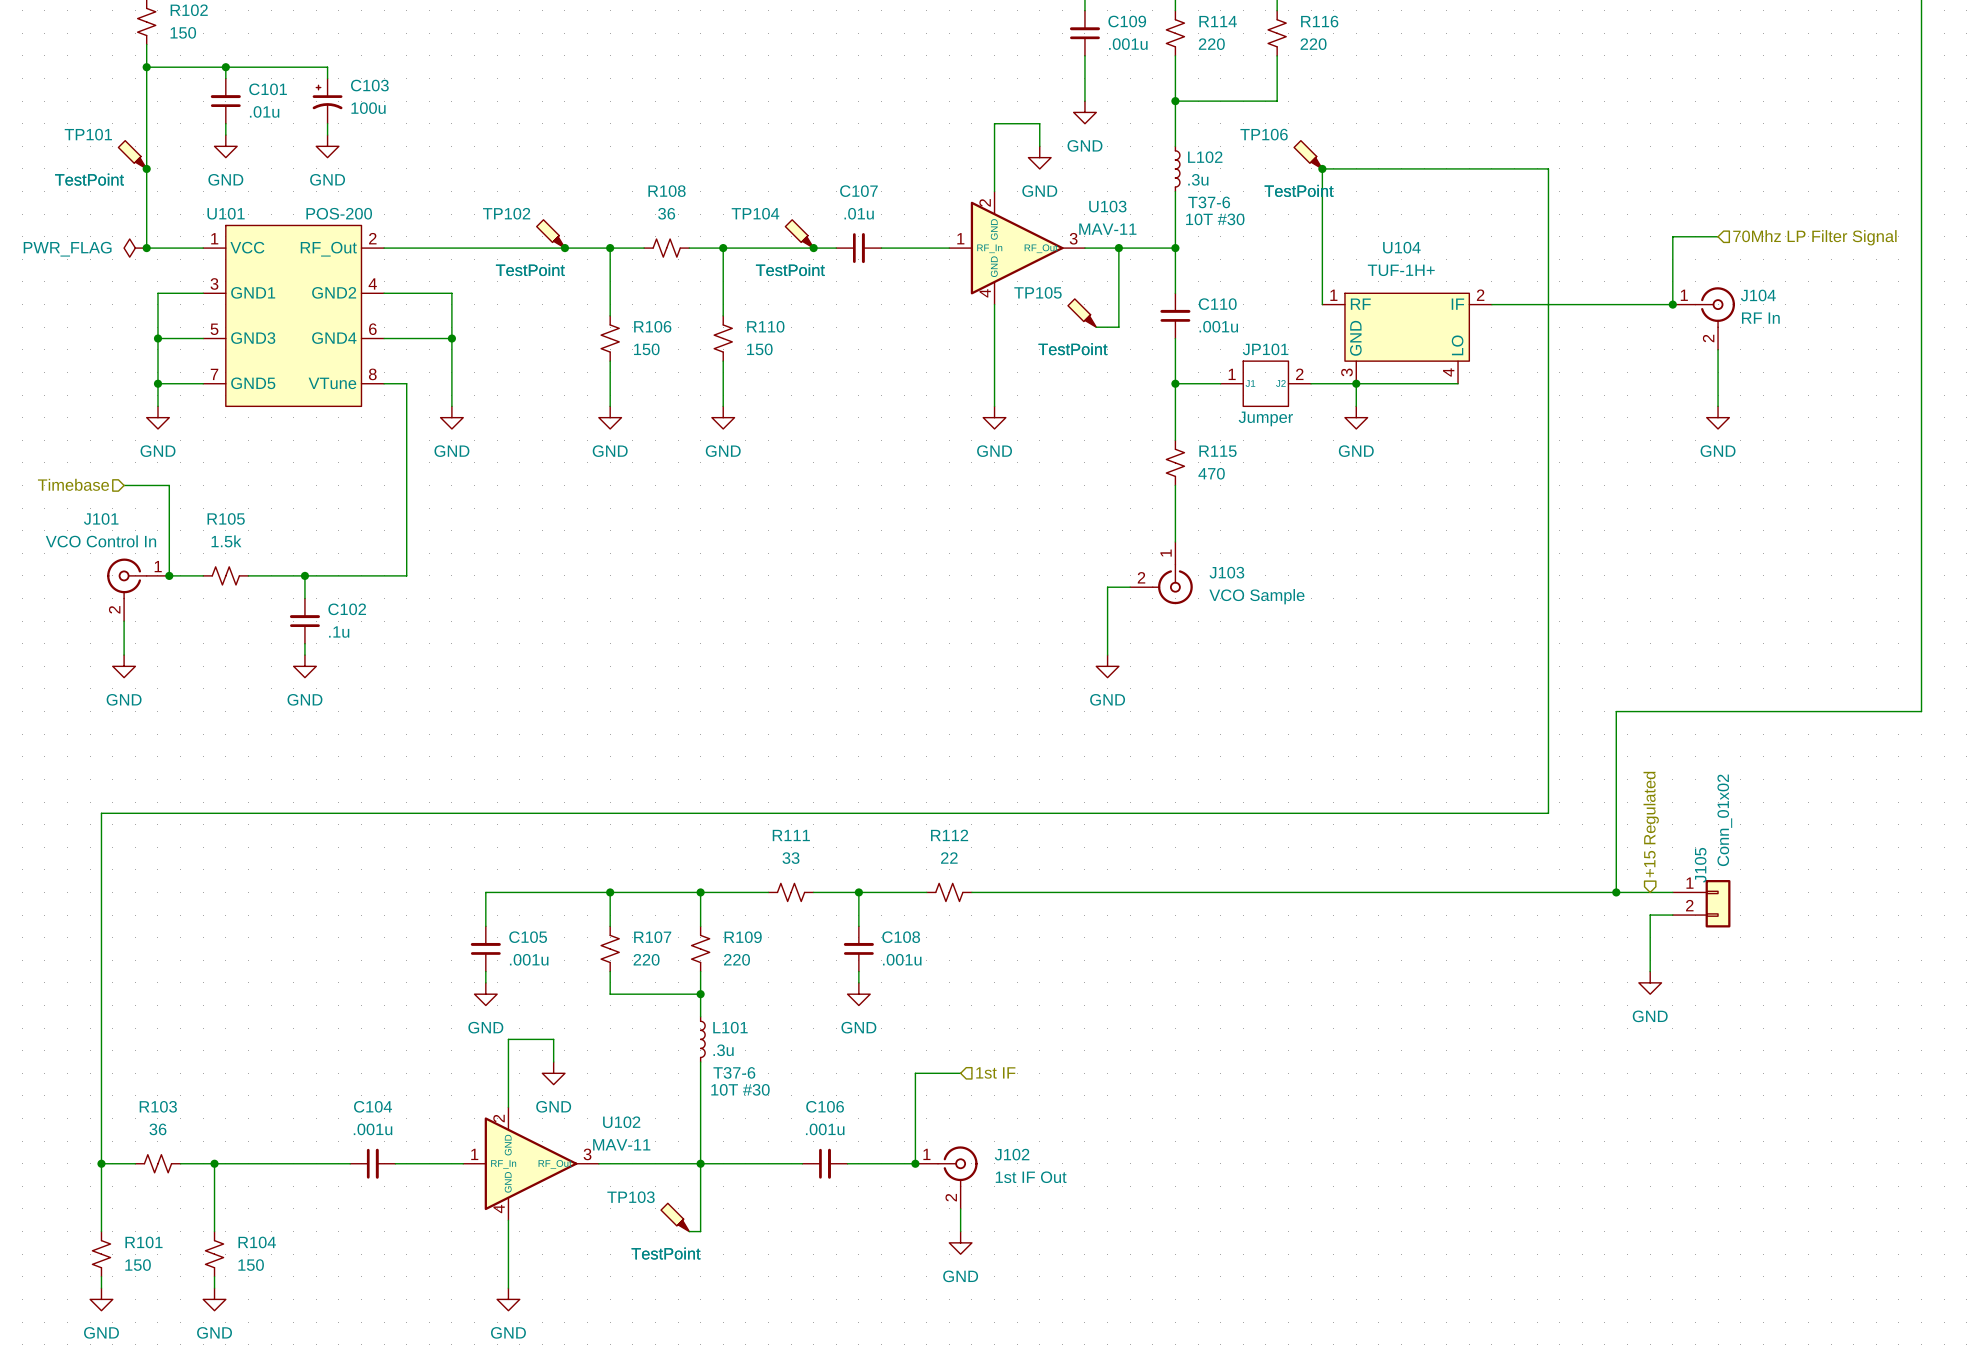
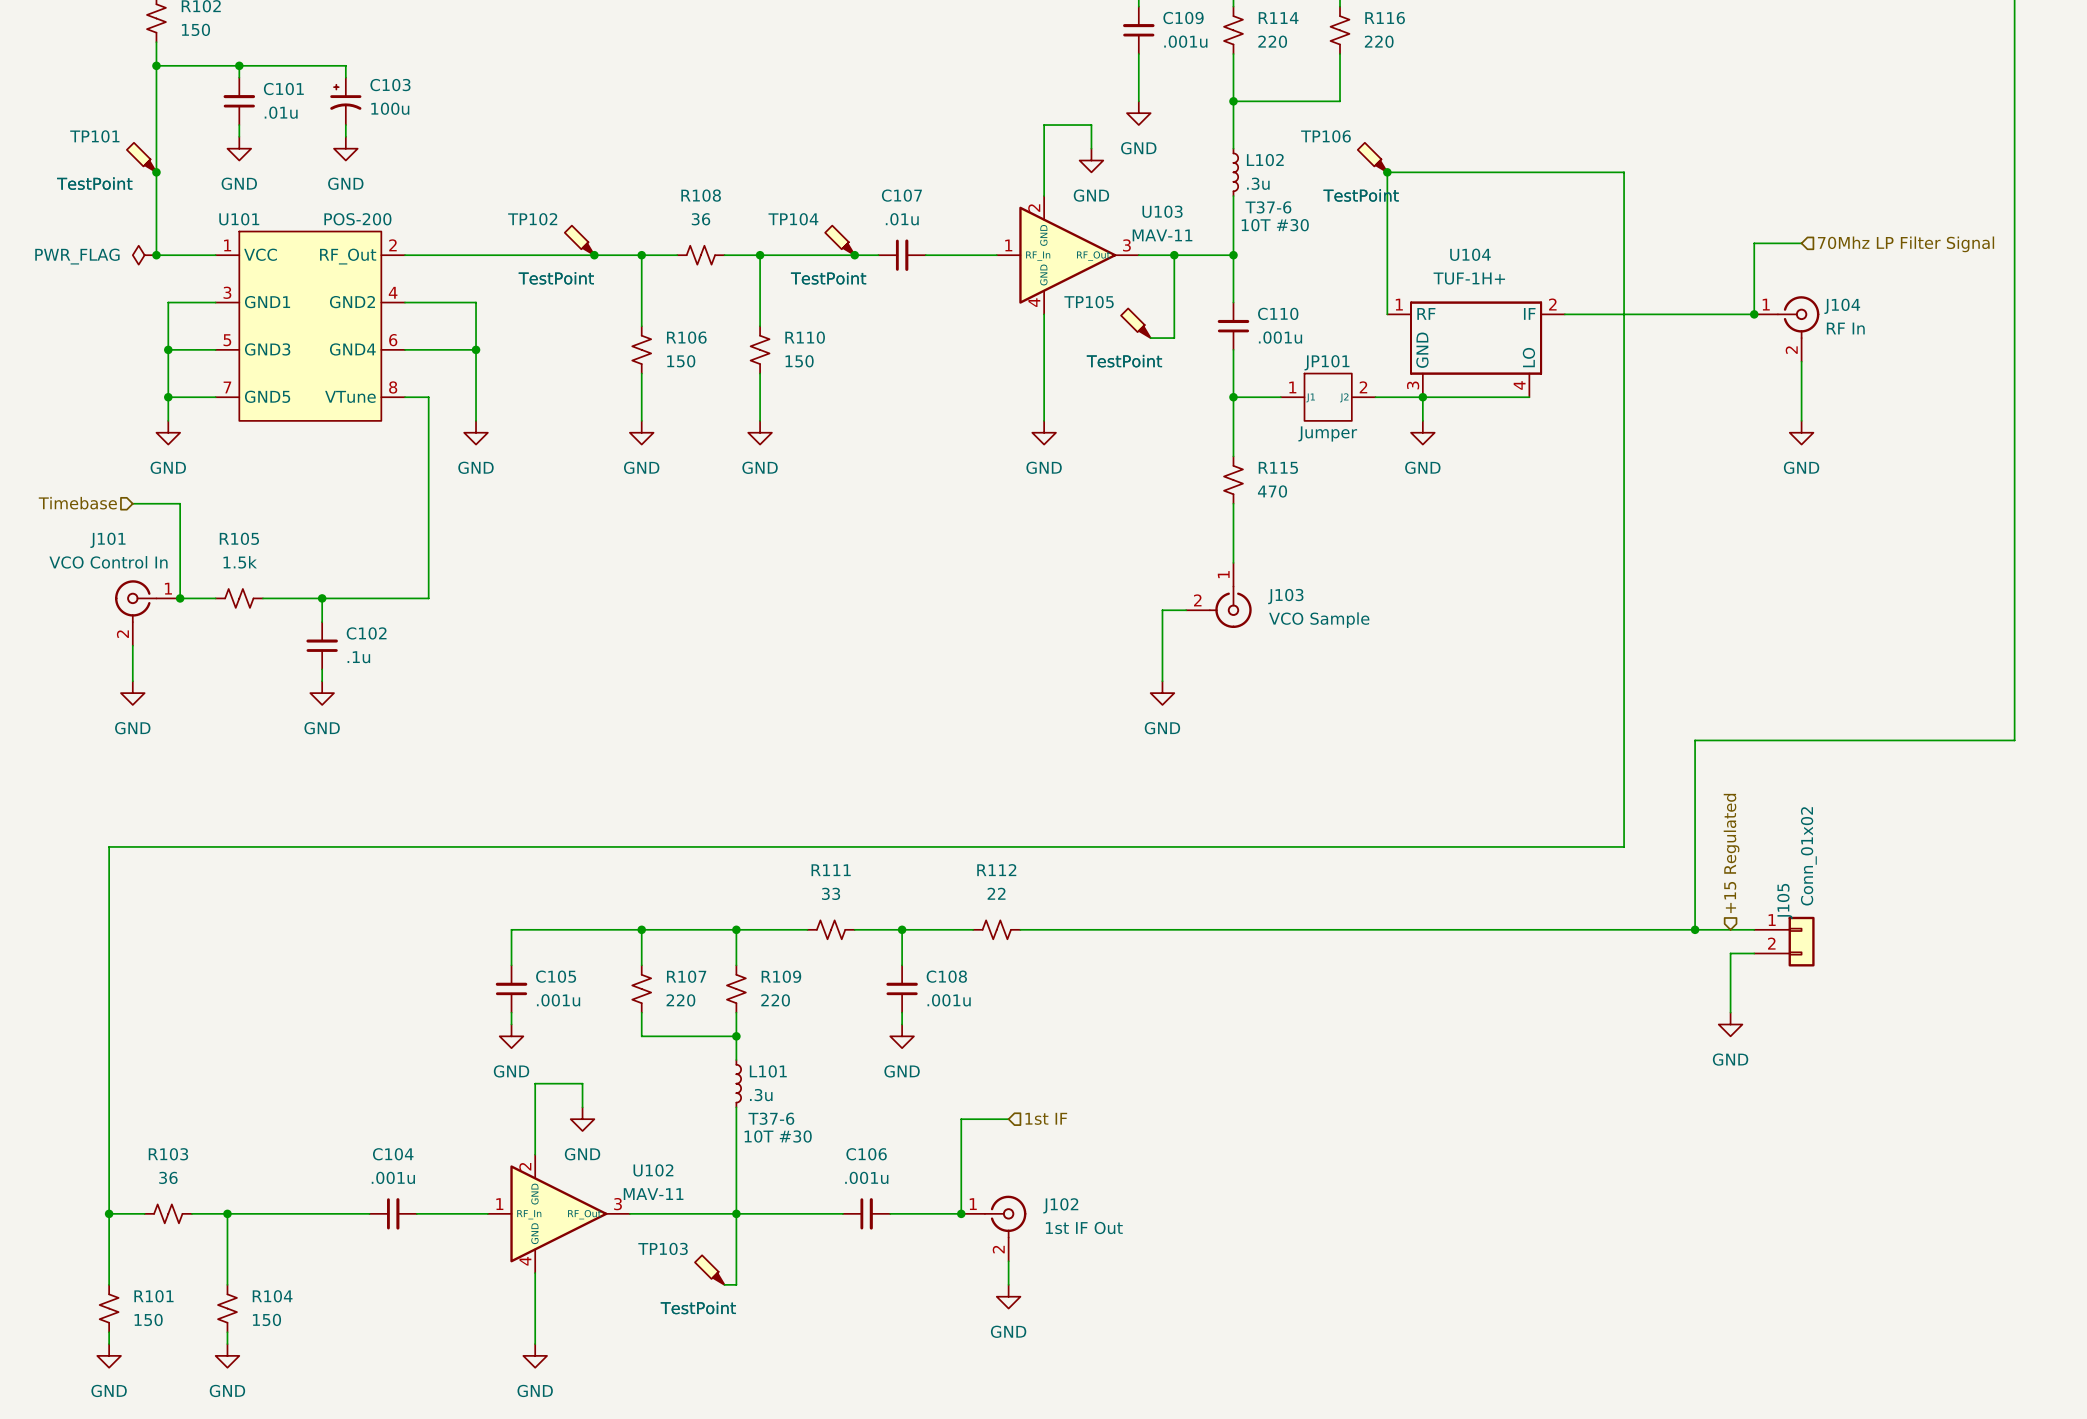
U104 symbol: [1322, 293, 1492, 384] -> [1387, 302, 1565, 398]

